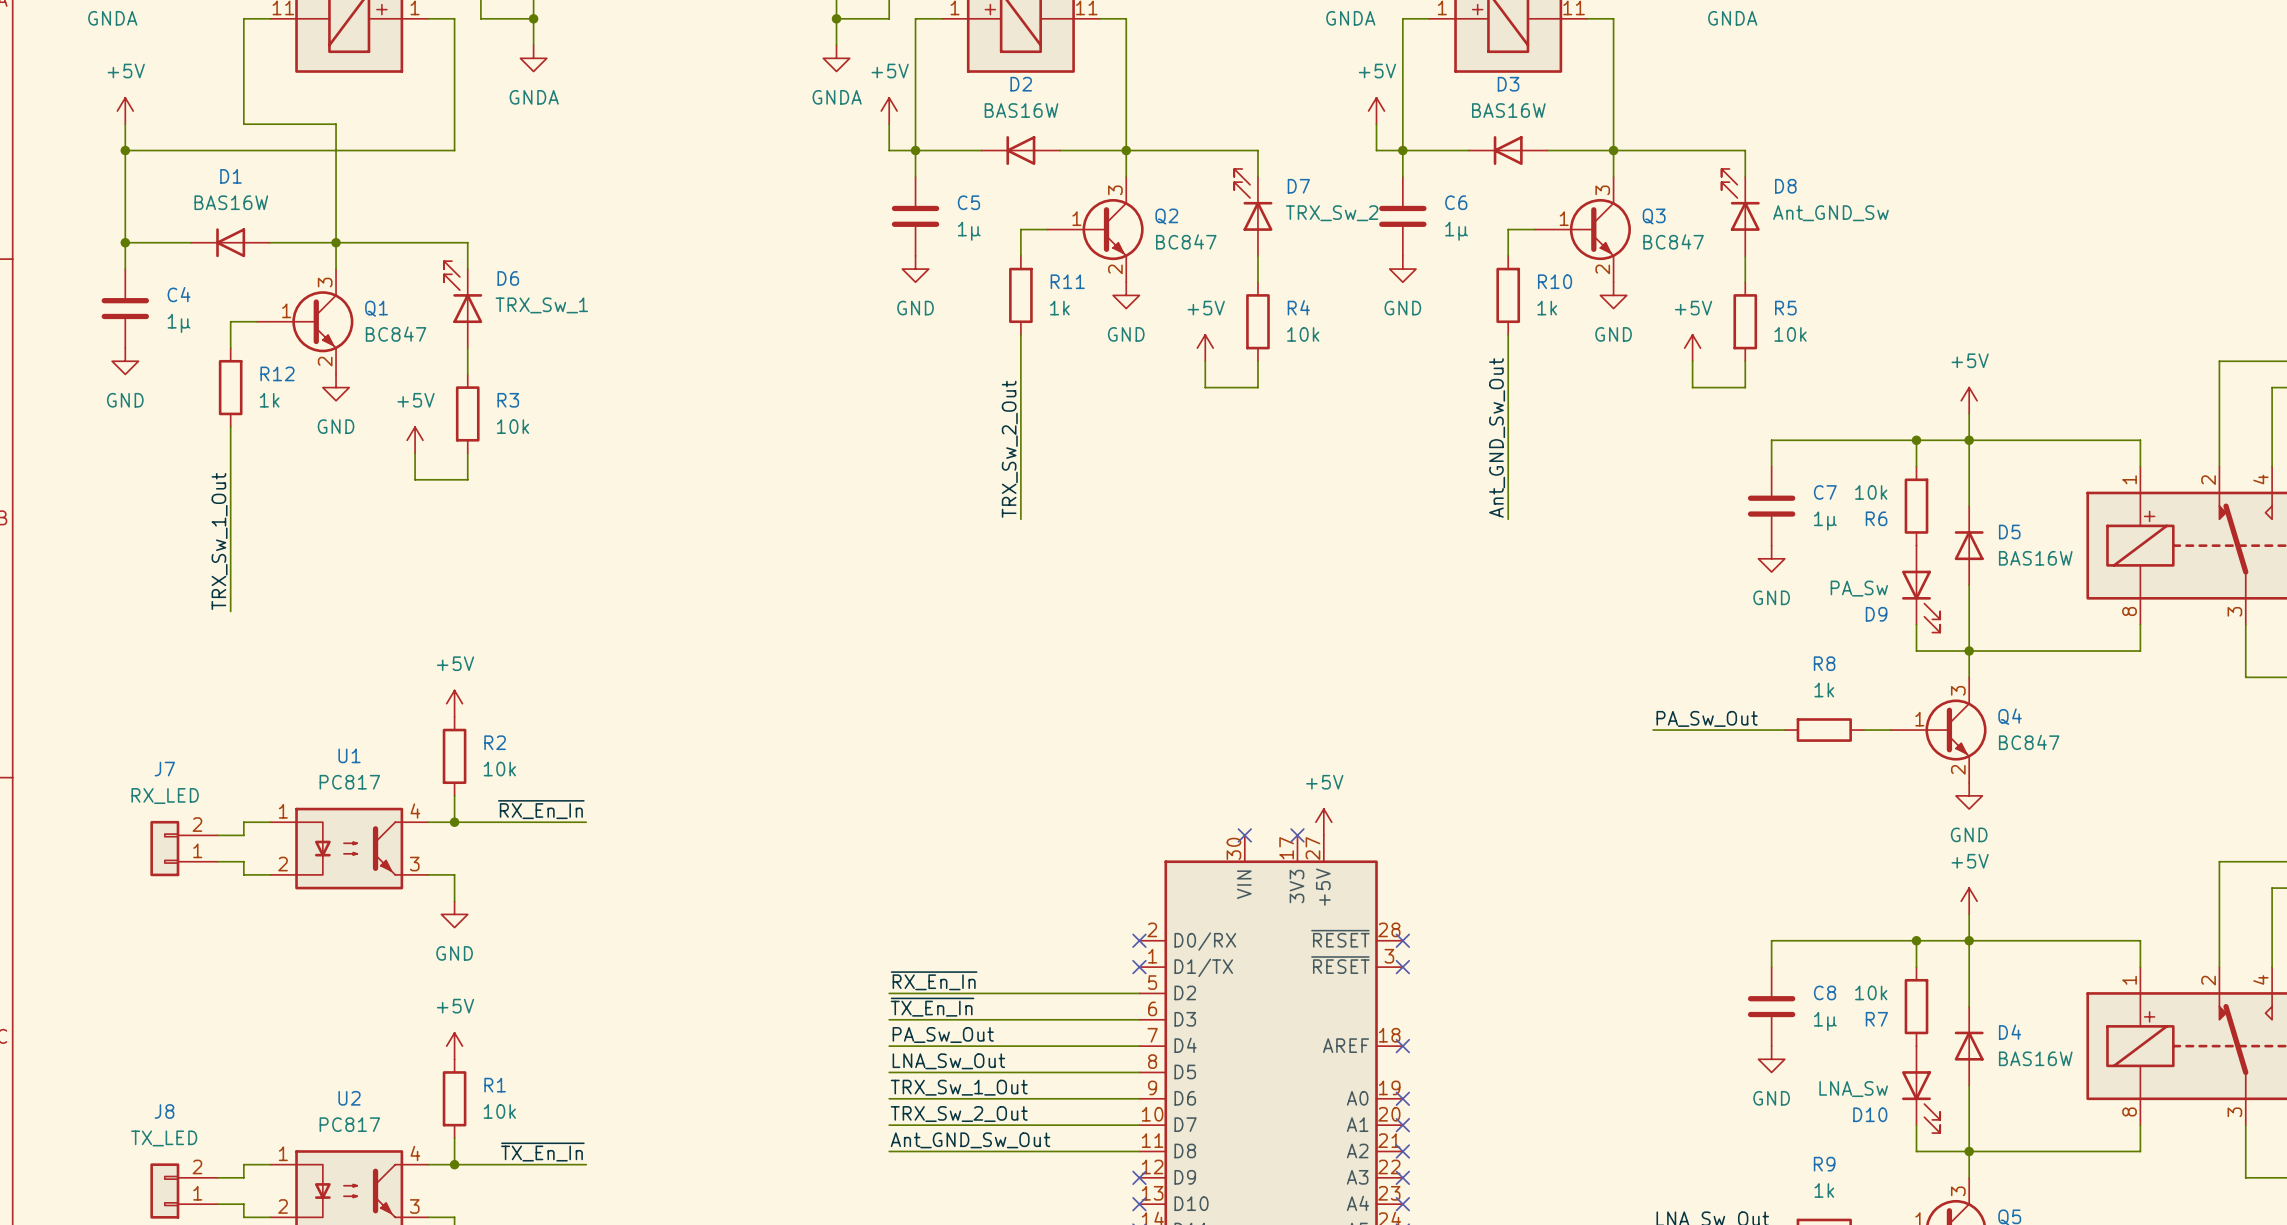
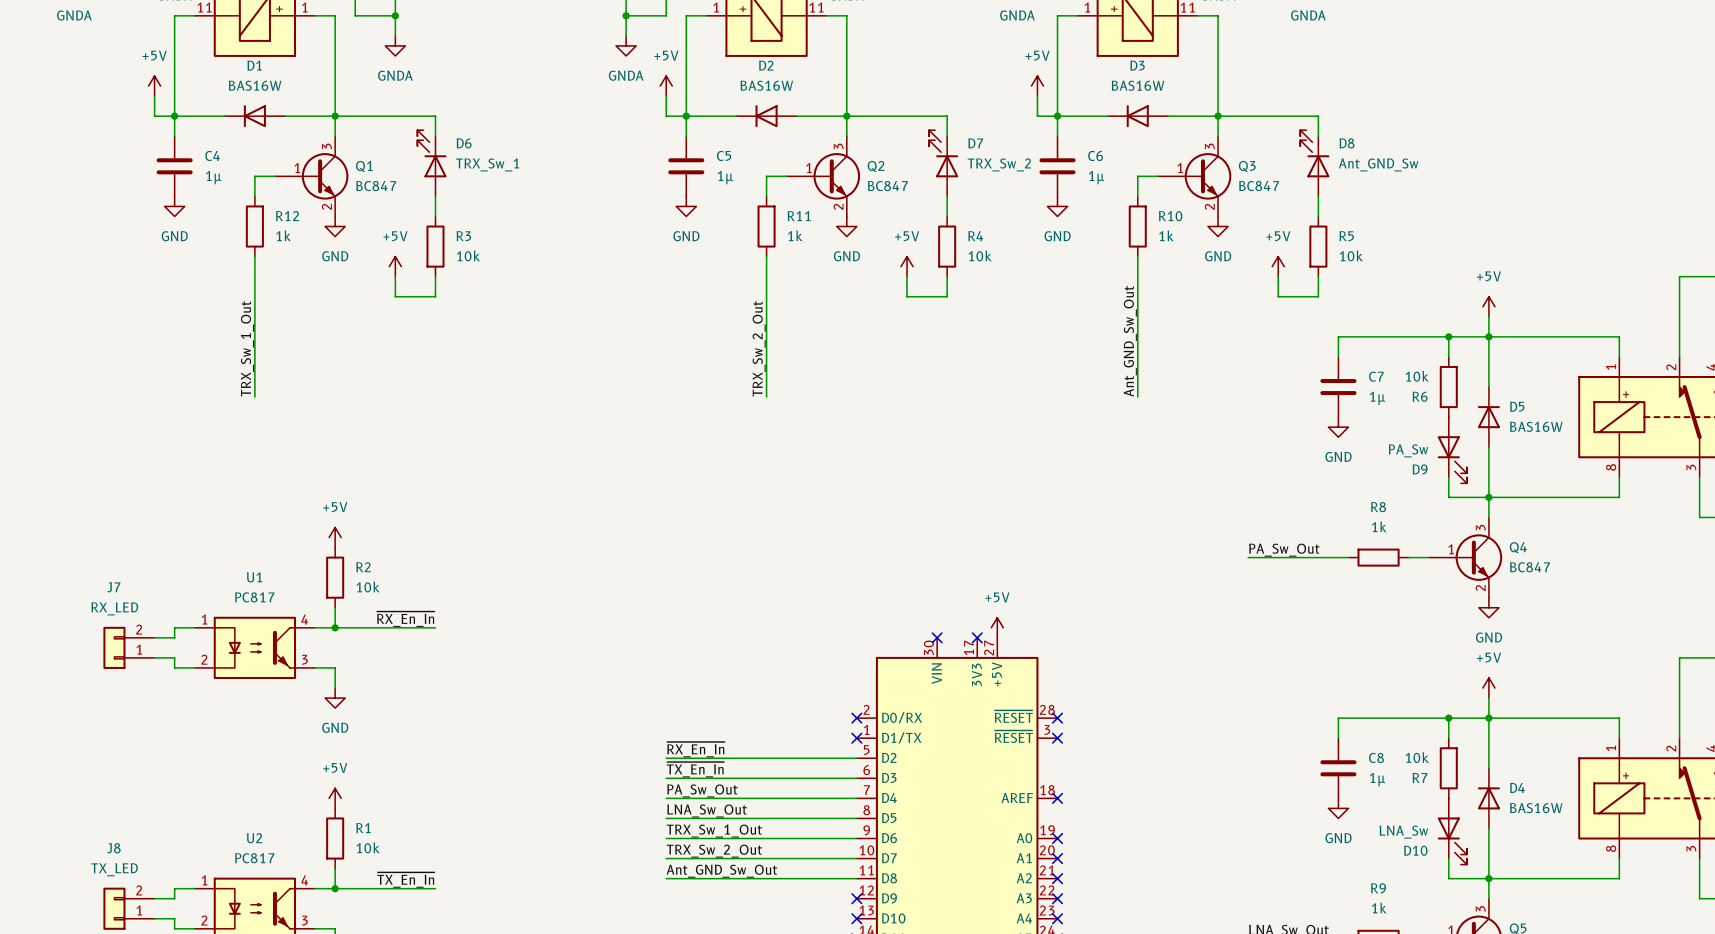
power symbol position: +5V (125, 111) -> +5V (154, 86)
wire: (125, 124) (125, 269) -> none
wire: (243, 124) (336, 124) (336, 269) -> (174, 96) (174, 136)
wire: (125, 150) (217, 150) -> (154, 96) (154, 116)
junction: (125, 150) -> none
junction: none -> (174, 116)
junction: none -> (335, 116)
wire: none -> (335, 136) (335, 116) (435, 116) (435, 136)
wire: (125, 242) (191, 242) -> none
junction: (125, 242) -> none
D1 position: (230, 242) -> (254, 116)
wire: (270, 242) (467, 242) (467, 269) -> none
junction: (336, 242) -> none
power symbol: none -> GND (174, 206)
power symbol: none -> GND (335, 226)
D6 position: (463, 304) -> (431, 163)
C4 position: (125, 308) -> (174, 166)
wire: (257, 321) (230, 321) (230, 348) -> (274, 176) (254, 176) (254, 196)
Q1 position: (305, 321) -> (311, 176)
wire: (467, 348) (467, 374) -> (435, 196) (435, 216)
power symbol: GND (125, 361) -> none
R12 position: (230, 387) -> (254, 226)
power symbol: GND (336, 387) -> none
R3 position: (467, 413) -> (435, 246)
wire: (230, 427) (230, 611) -> (254, 256) (254, 397)
power symbol position: +5V (415, 440) -> +5V (395, 266)
wire: (415, 453) (415, 479) (467, 479) (467, 453) -> (395, 276) (395, 296) (435, 296) (435, 276)
label position: TRX_Sw_1_Out (219, 541) -> TRX_Sw_1_Out (247, 348)

